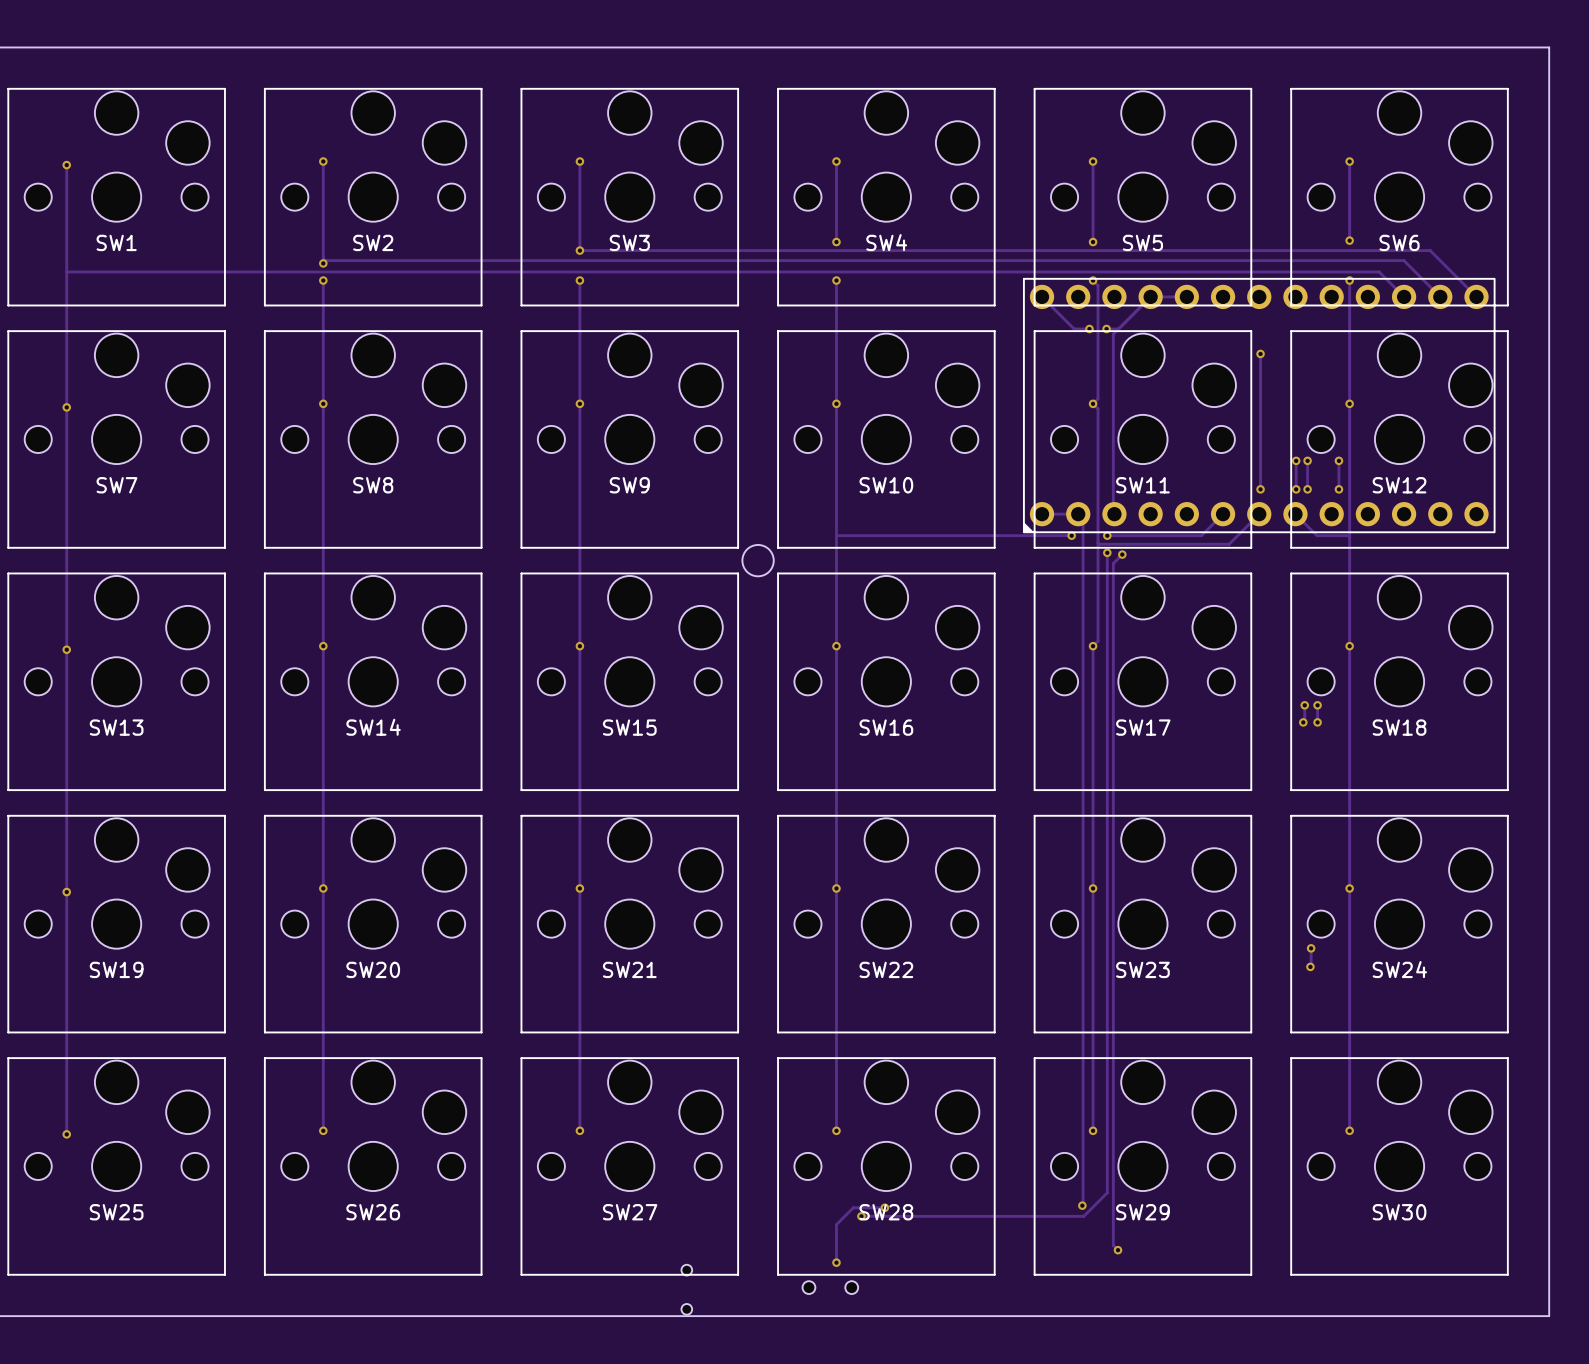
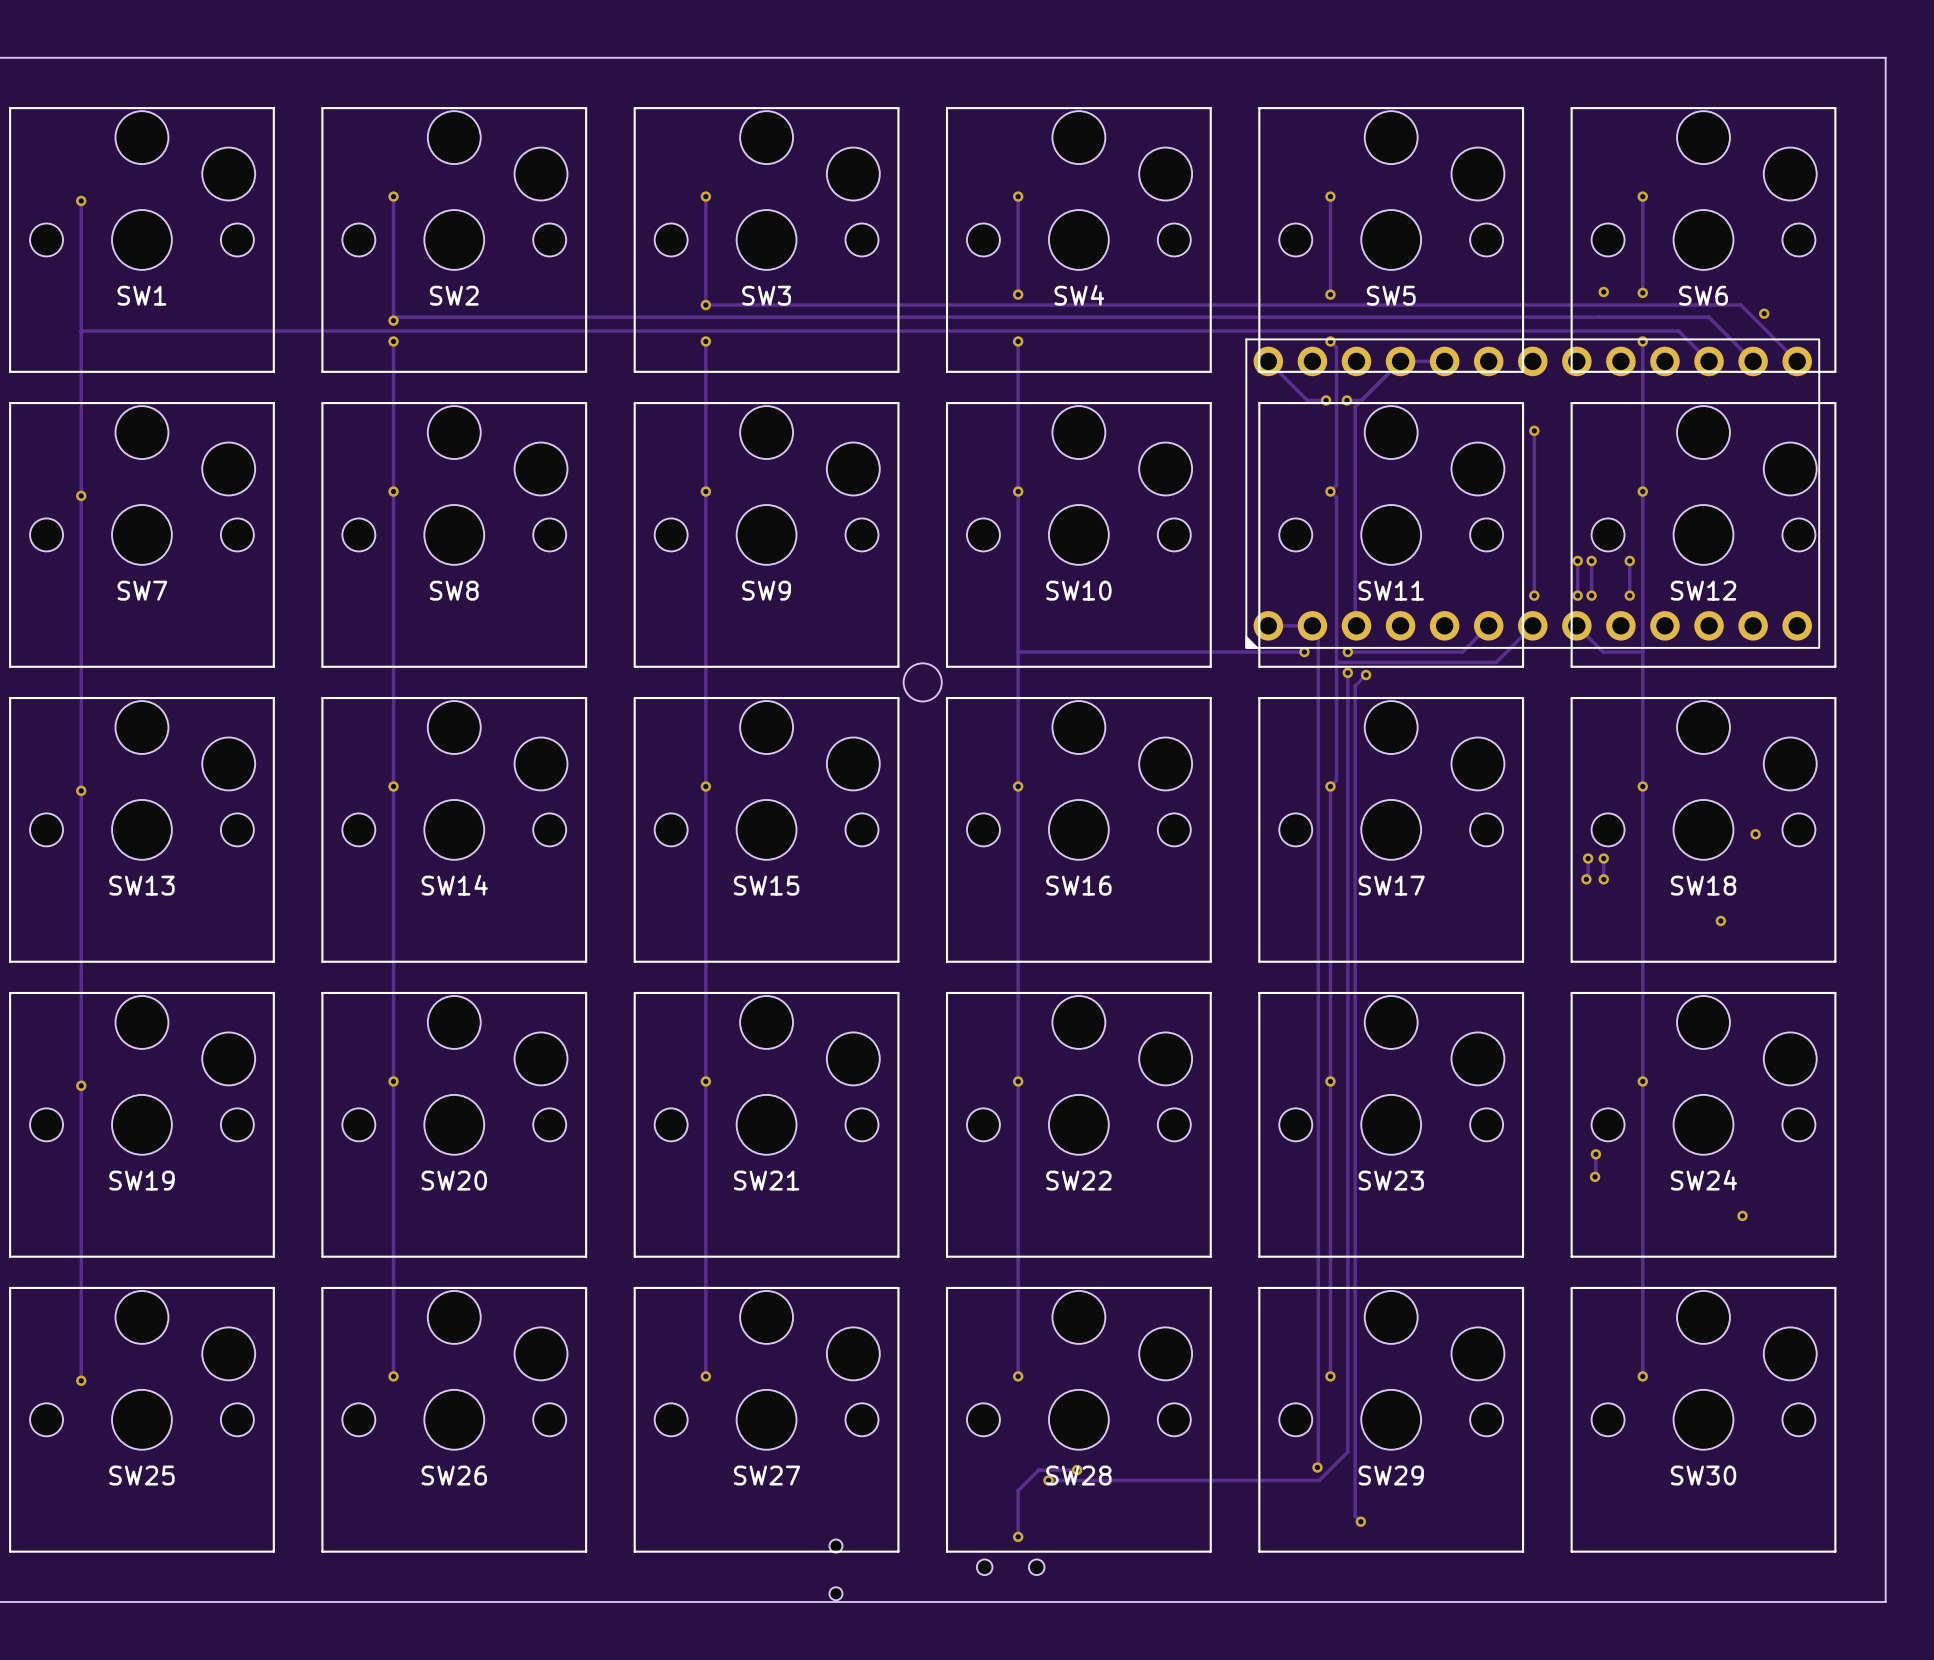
via: none -> (1603, 292)
via: none -> (1764, 313)
via: none -> (1755, 834)
via: none -> (1720, 920)
via: none -> (1742, 1215)

